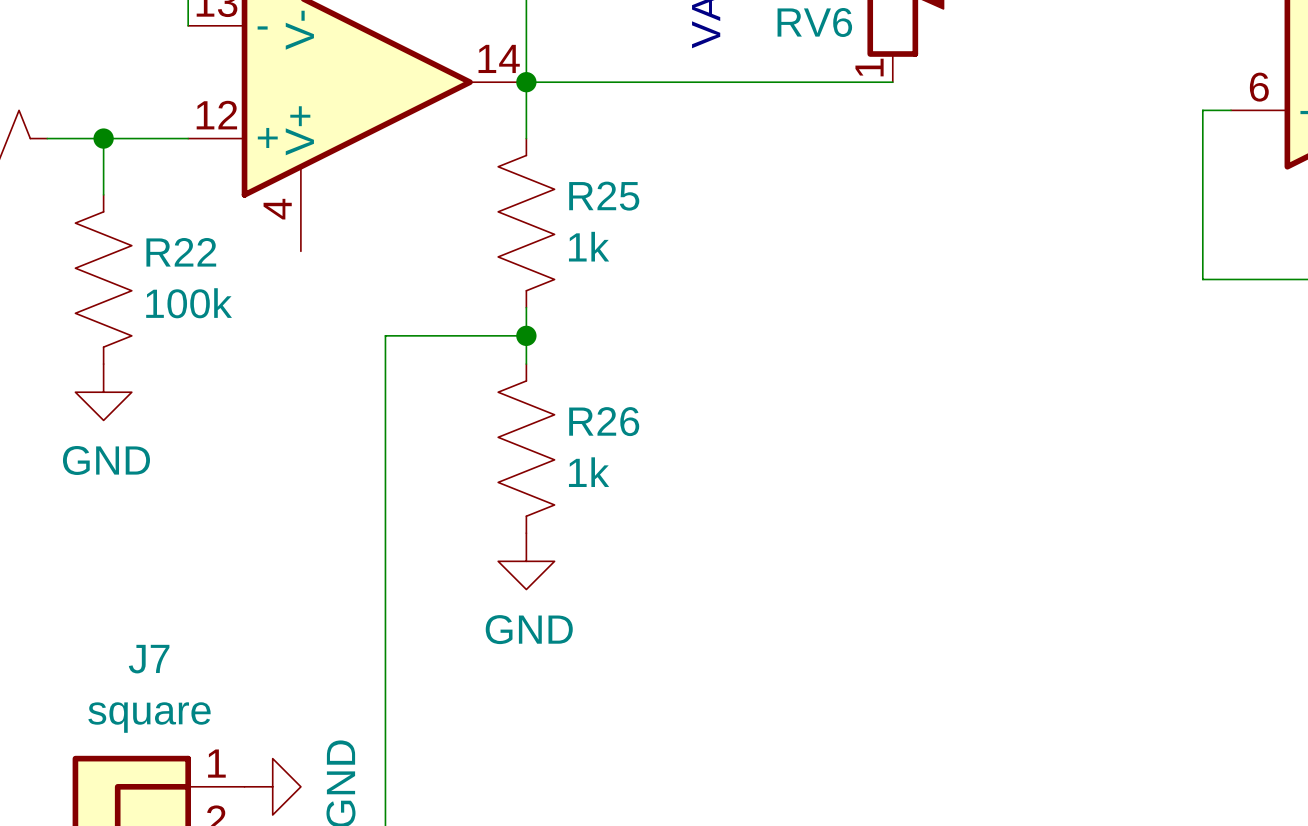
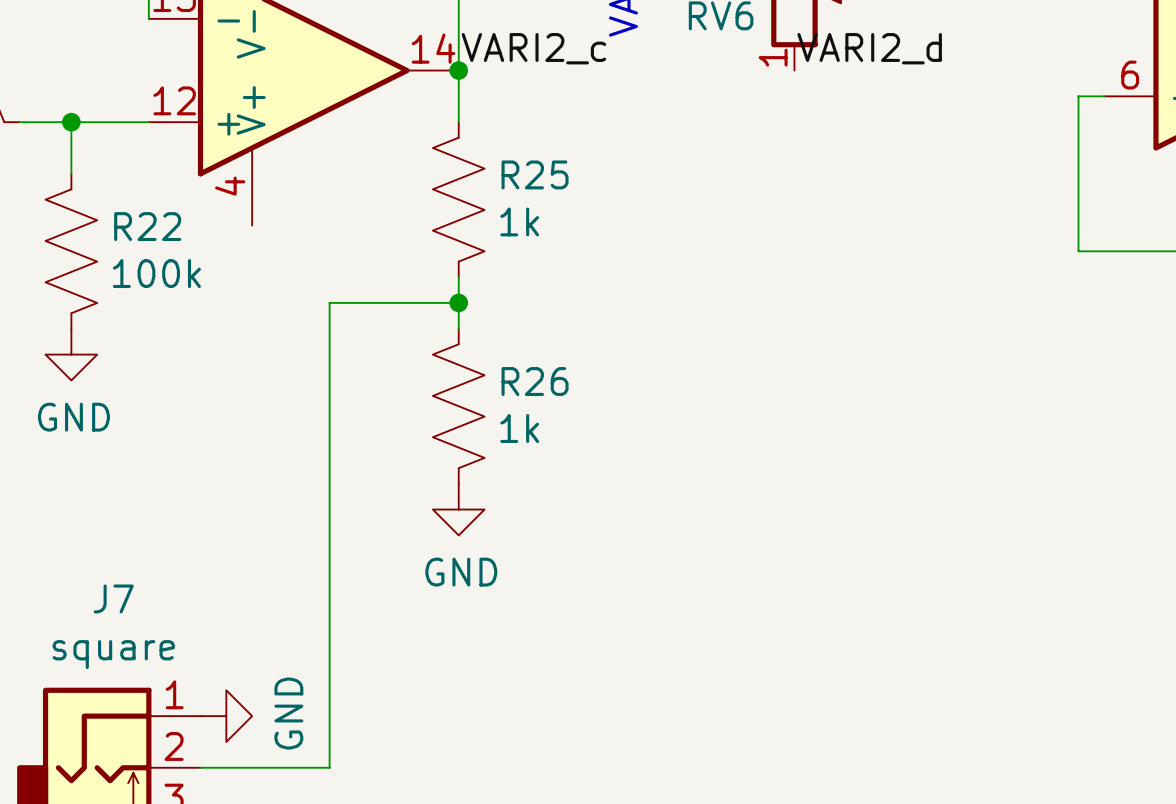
label: none -> VARI2_c (533, 48)
label: none -> VARI2_d (869, 48)
wire: (526, 82) (892, 82) -> none

